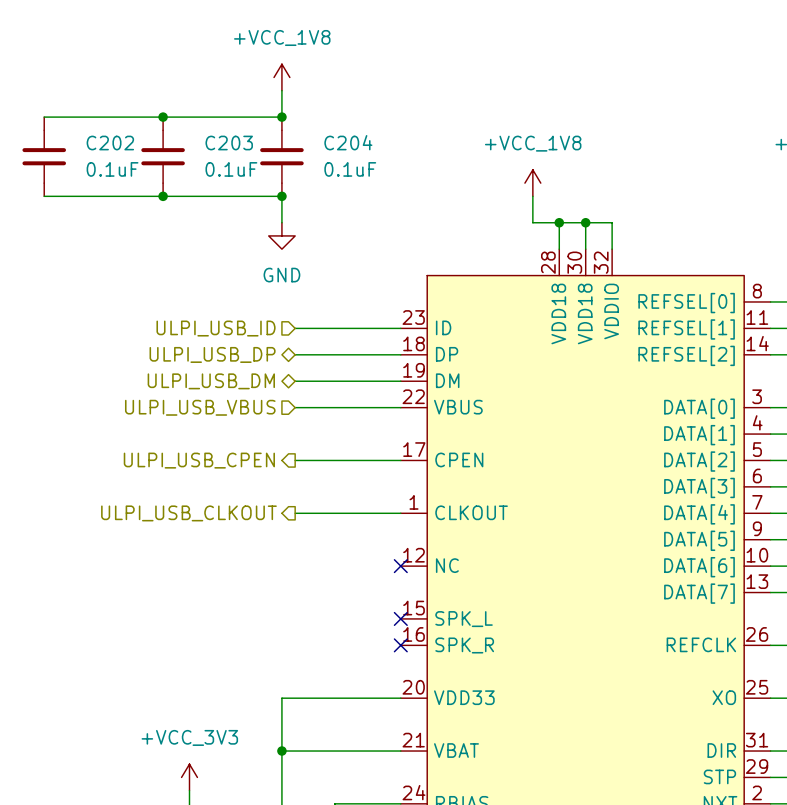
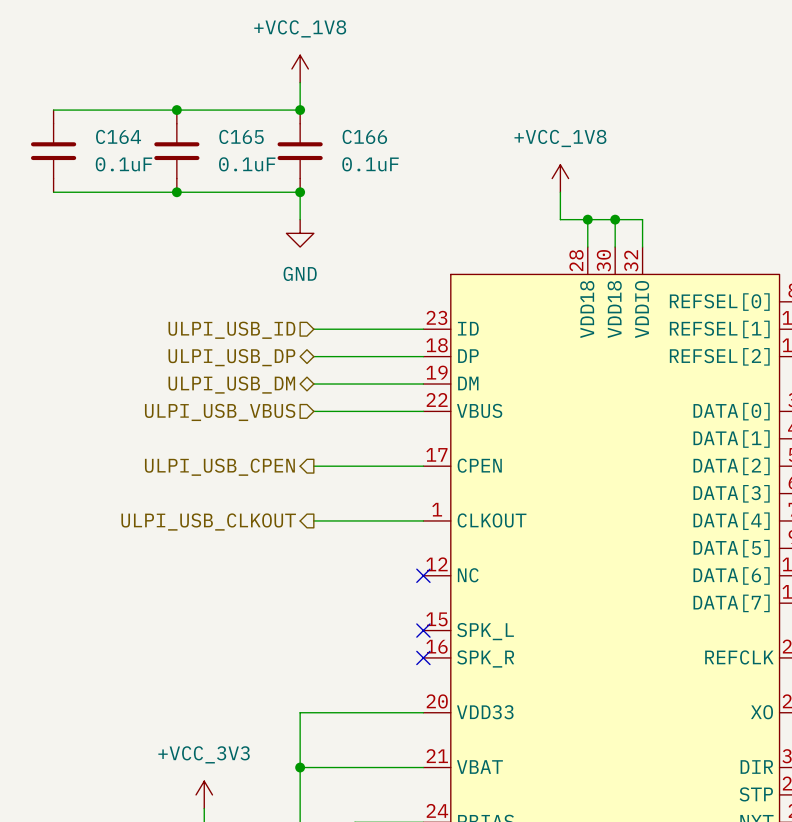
C204 name: C204 (348, 142) -> C166 (364, 136)
C202 name: C202 (110, 143) -> C164 (118, 136)
C203 name: C203 (229, 143) -> C165 (241, 136)

